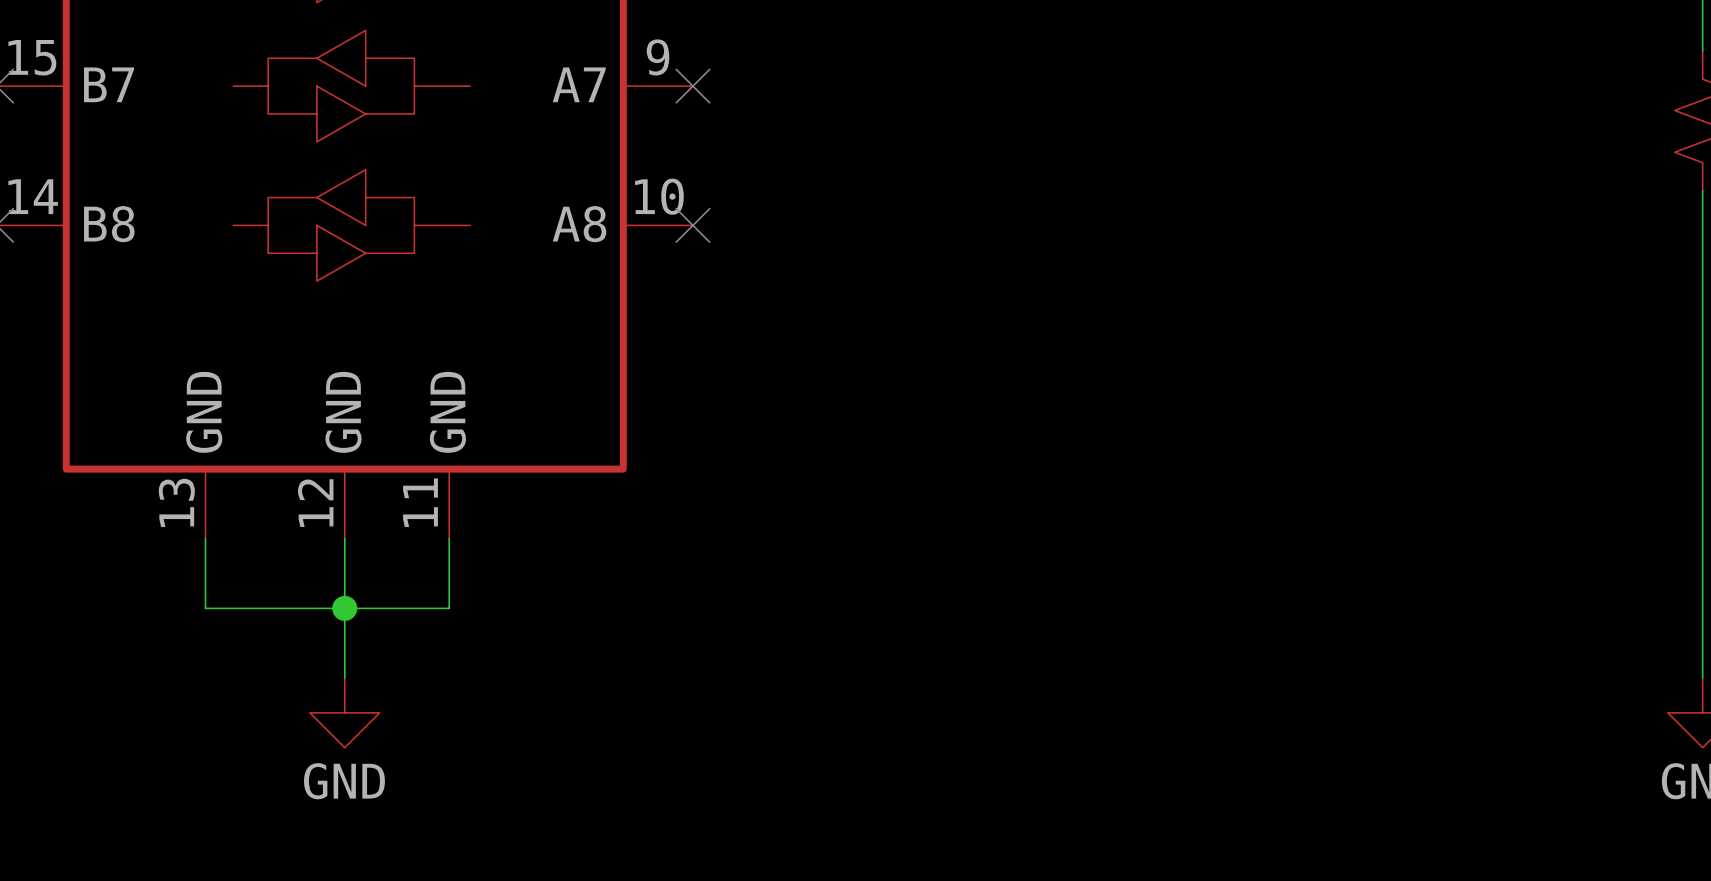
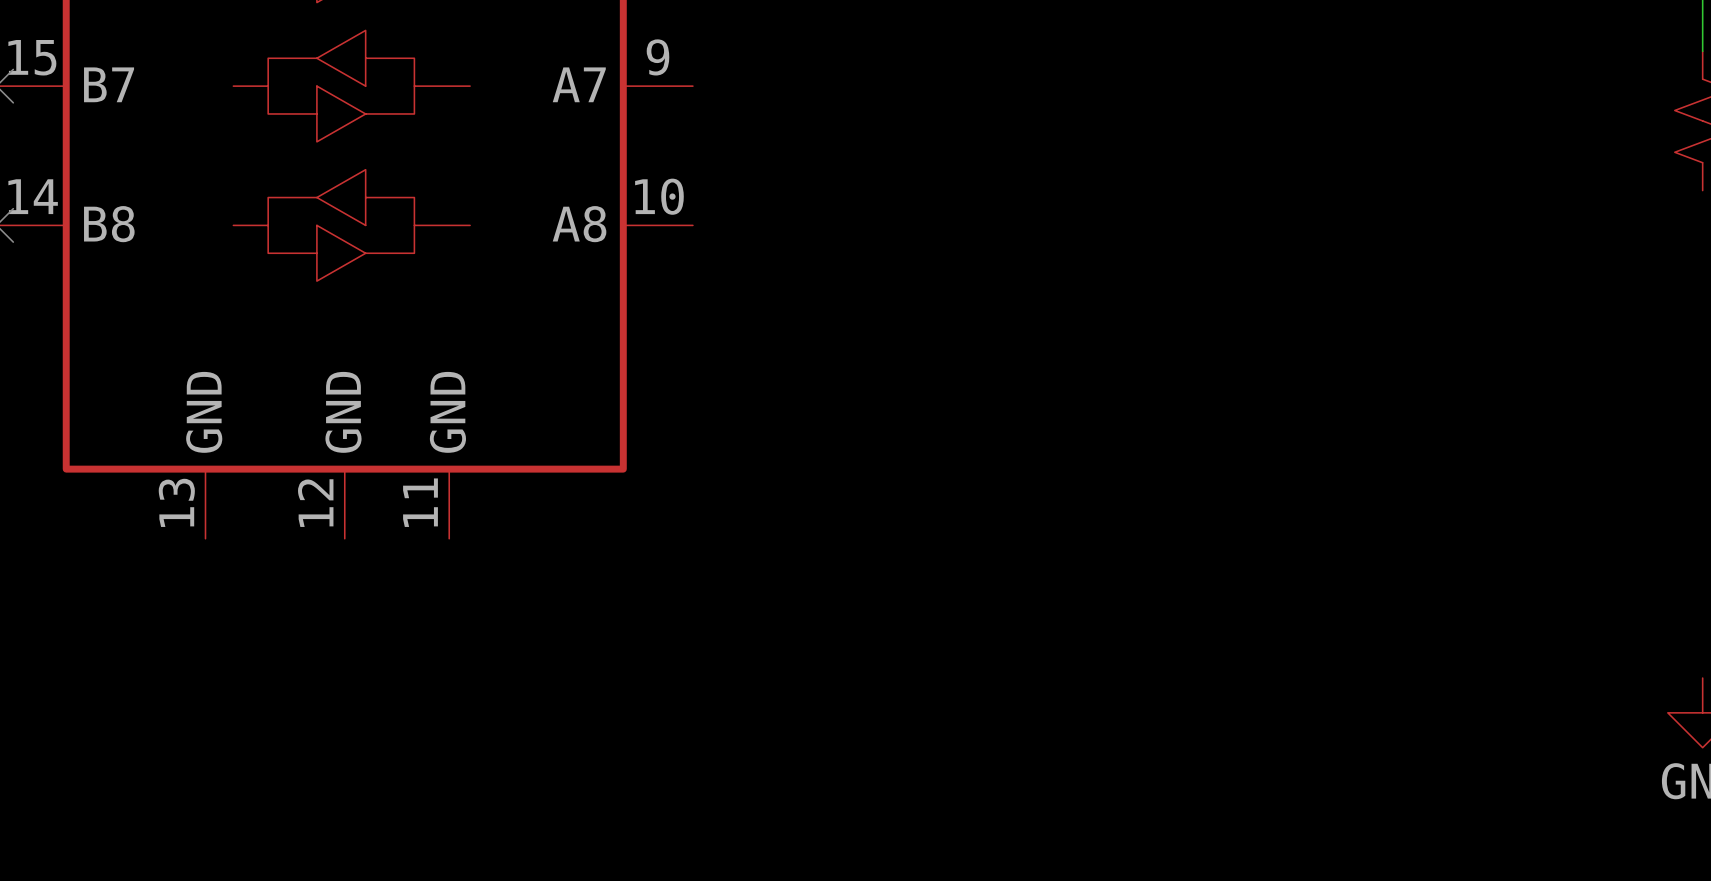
no-connect mark: (692, 86) -> none
wire: (1702, 190) (1702, 678) -> none
no-connect mark: (692, 225) -> none
wire: (205, 538) (205, 608) (449, 608) (449, 538) -> none
wire: (344, 538) (344, 678) -> none
junction: (344, 608) -> none
power symbol: GND (344, 712) -> none

